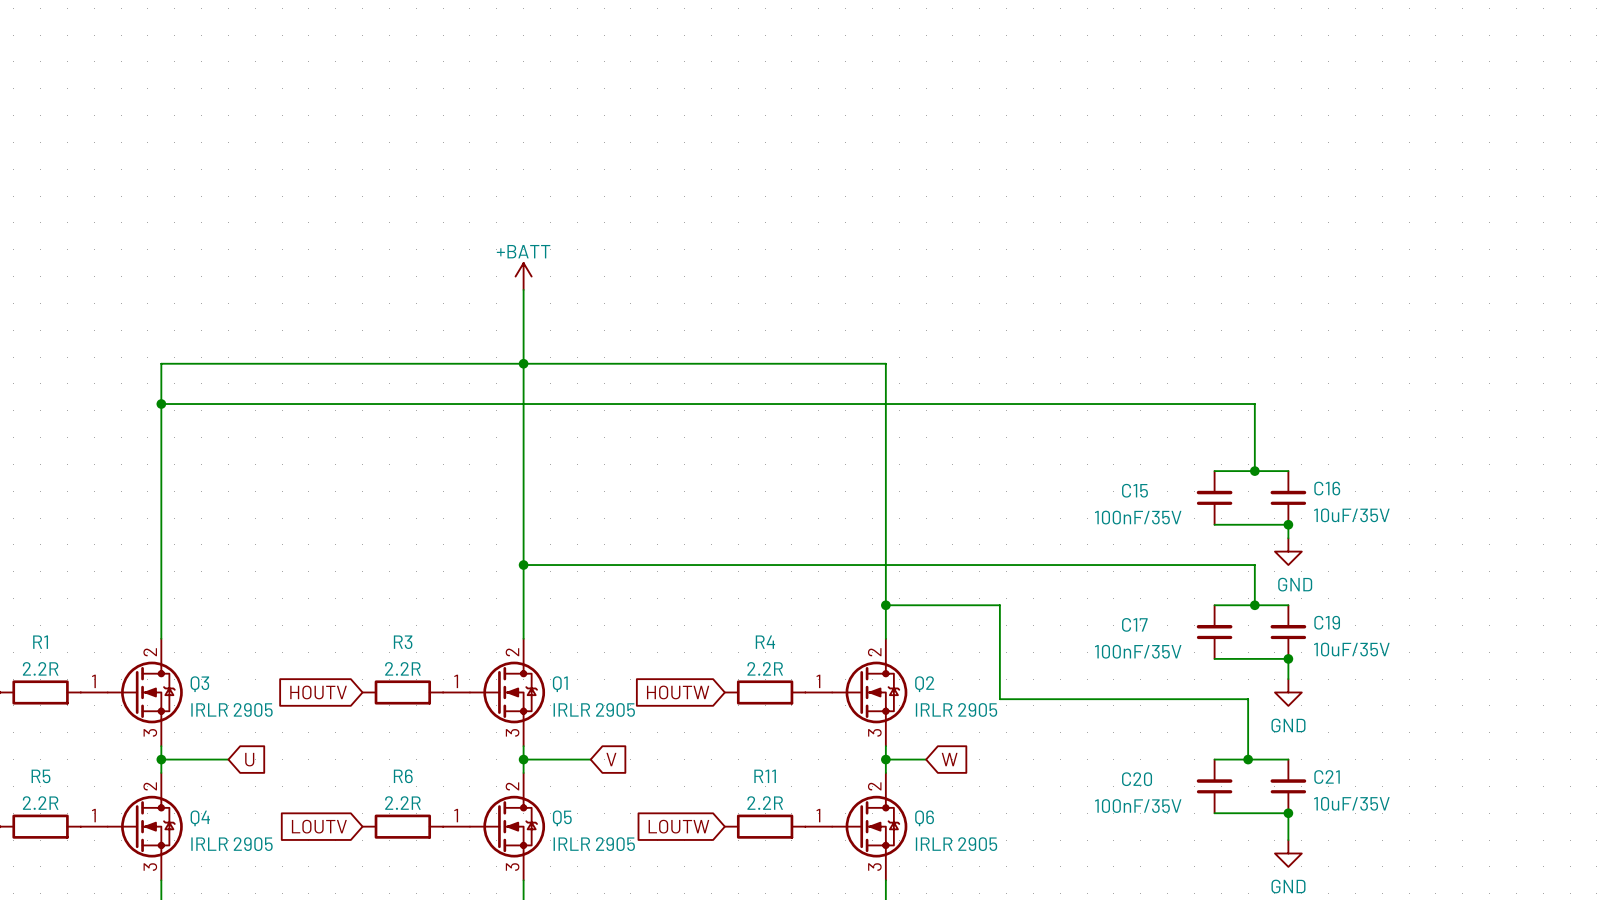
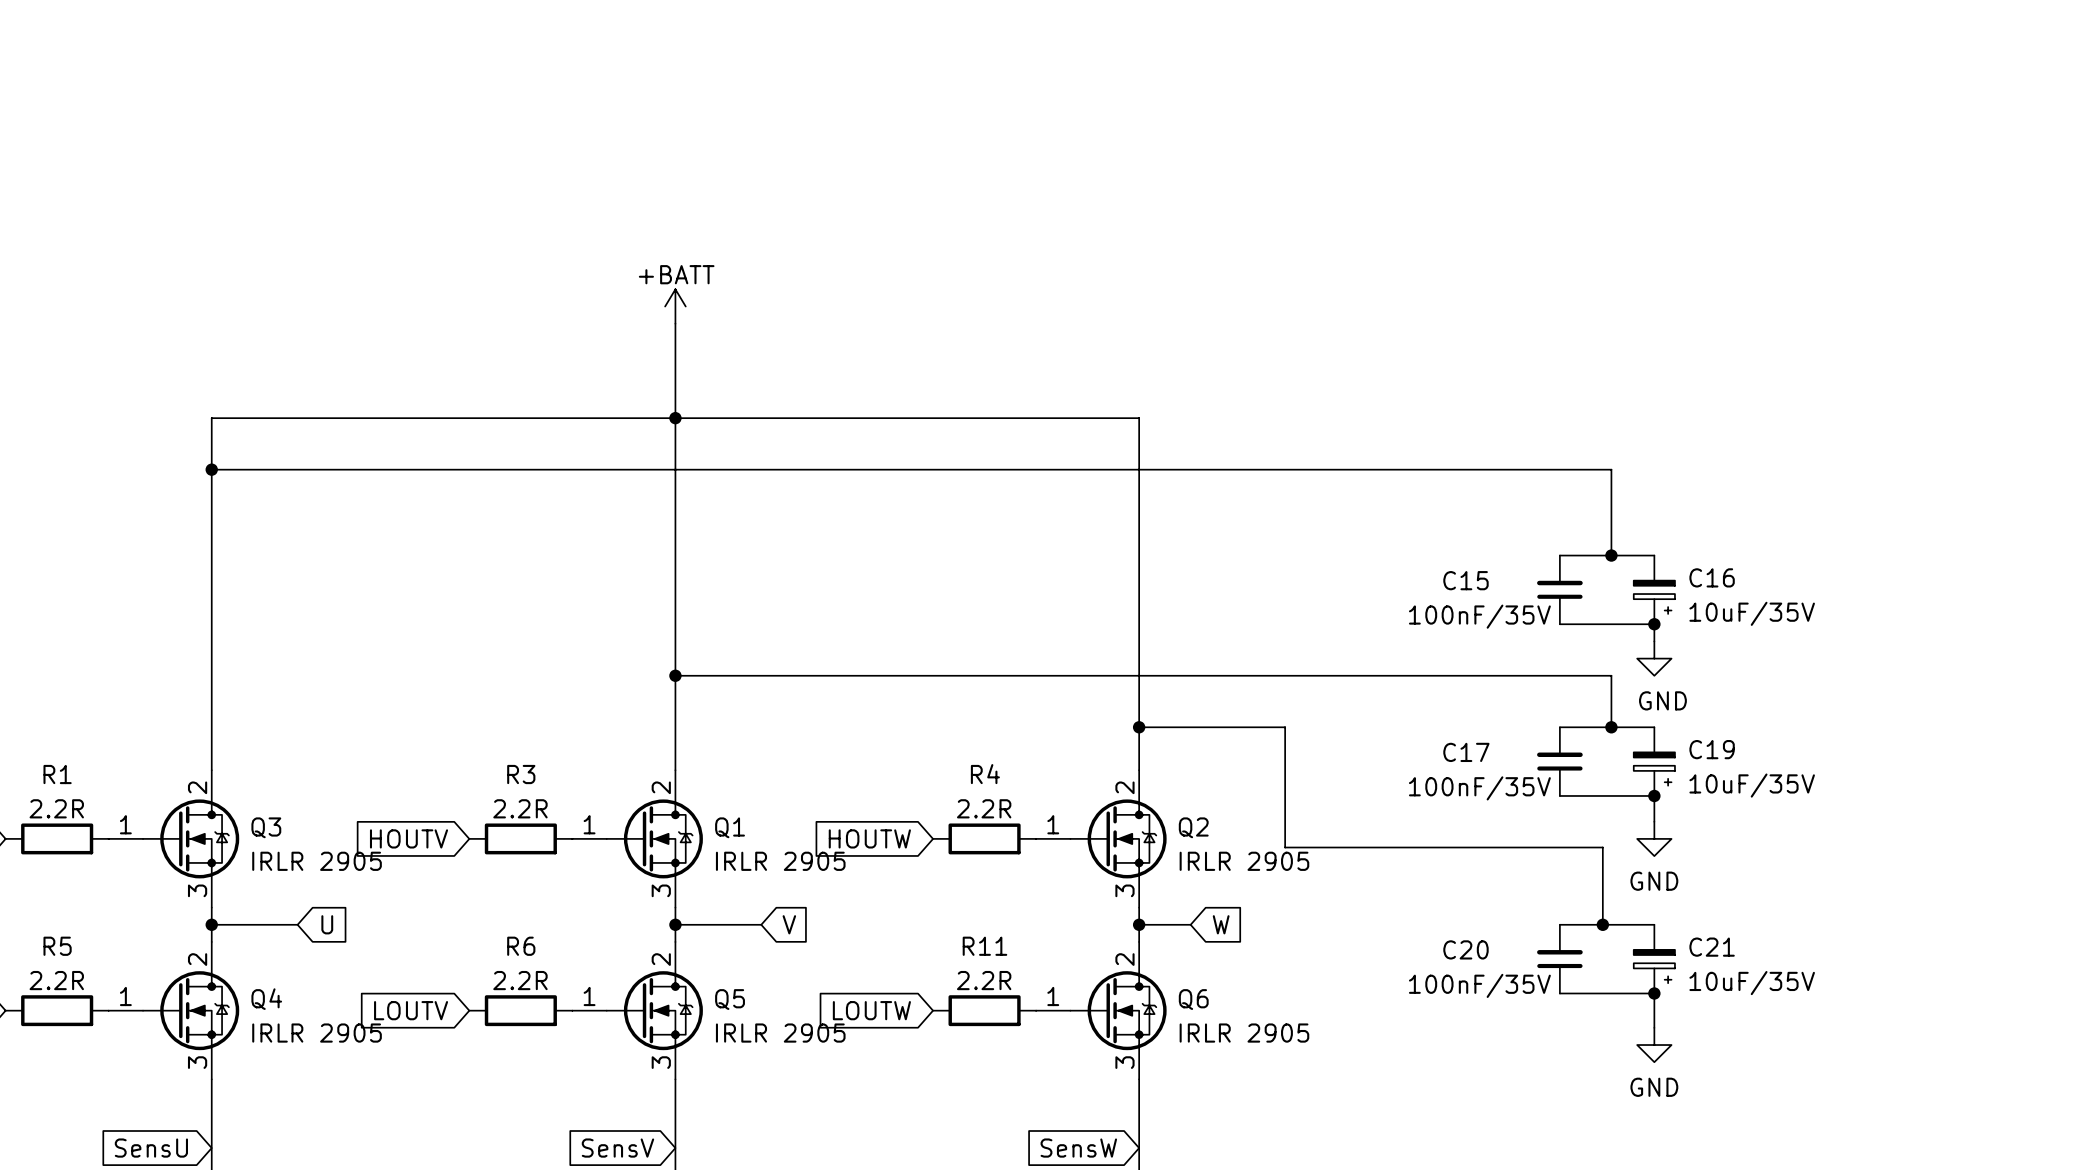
C16 symbol: [1270, 471, 1307, 525] -> [1633, 555, 1675, 625]
C19 symbol: [1270, 605, 1307, 659] -> [1633, 727, 1675, 796]
C21 symbol: [1270, 759, 1307, 814] -> [1633, 924, 1675, 994]

